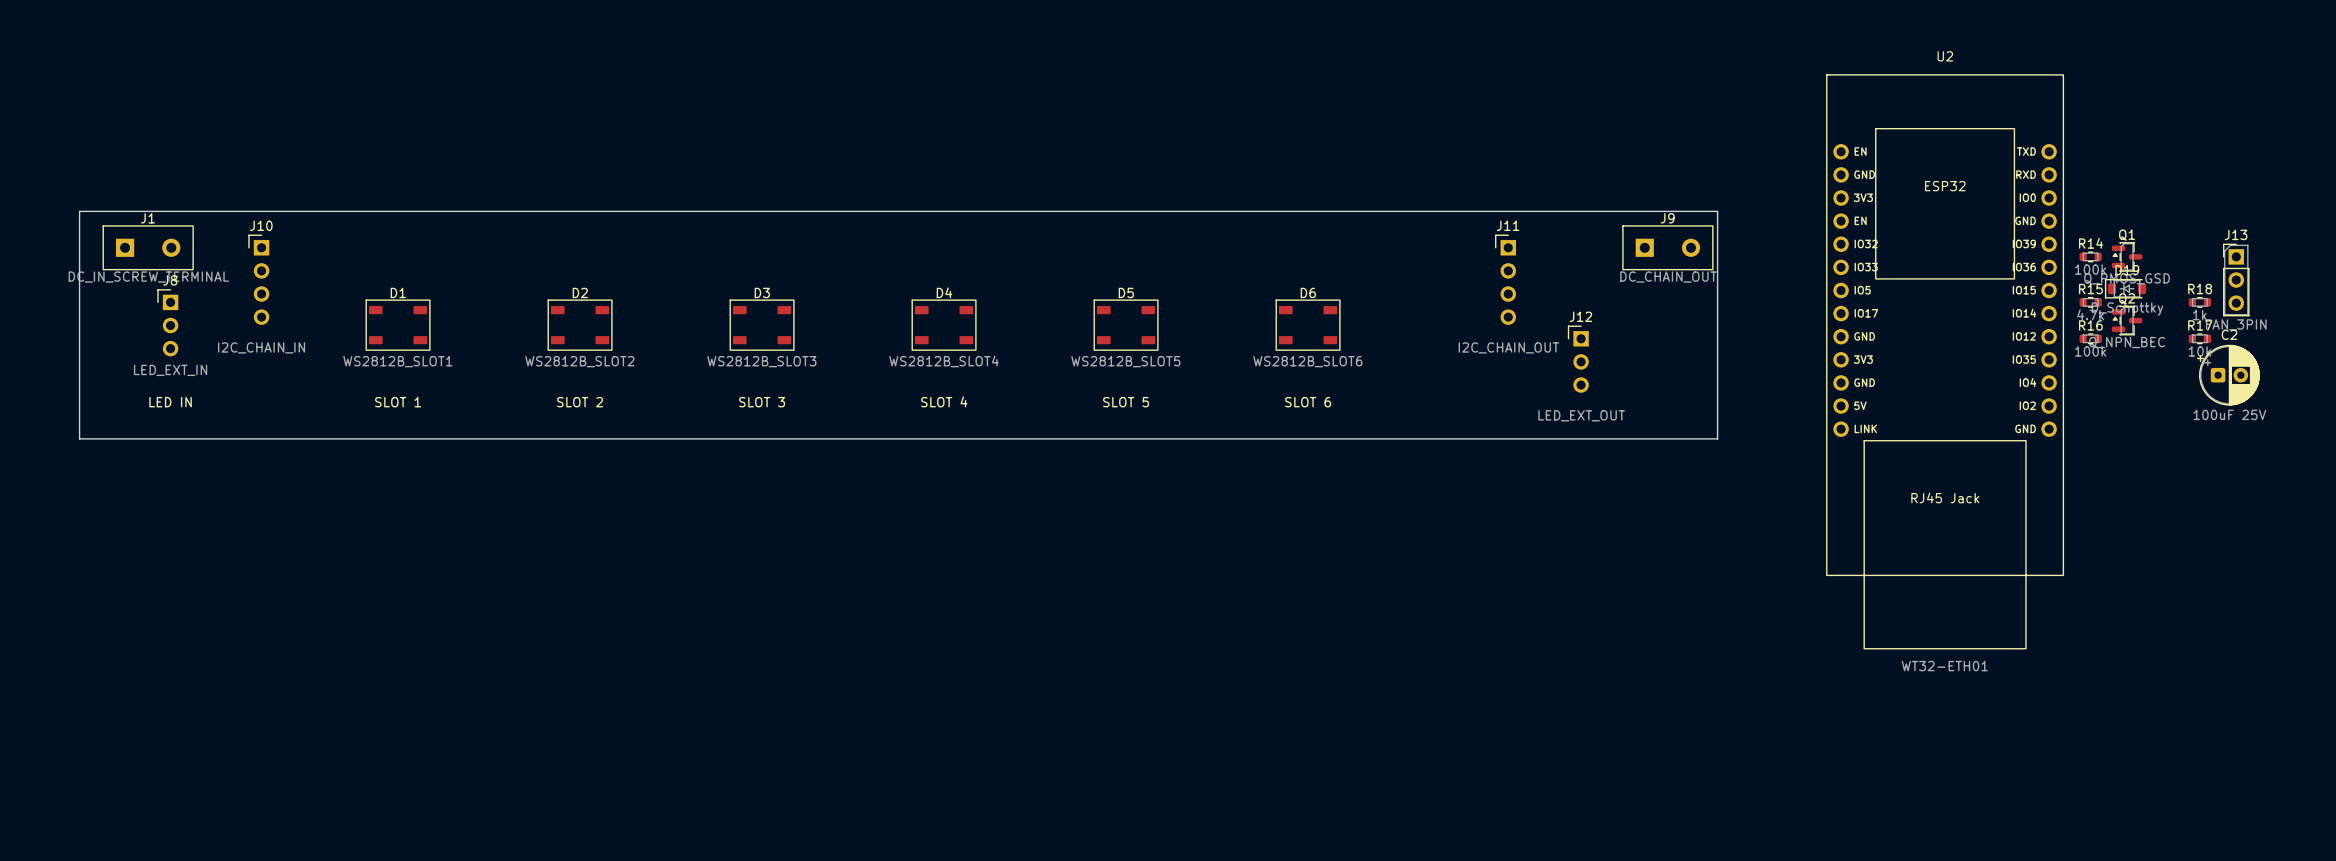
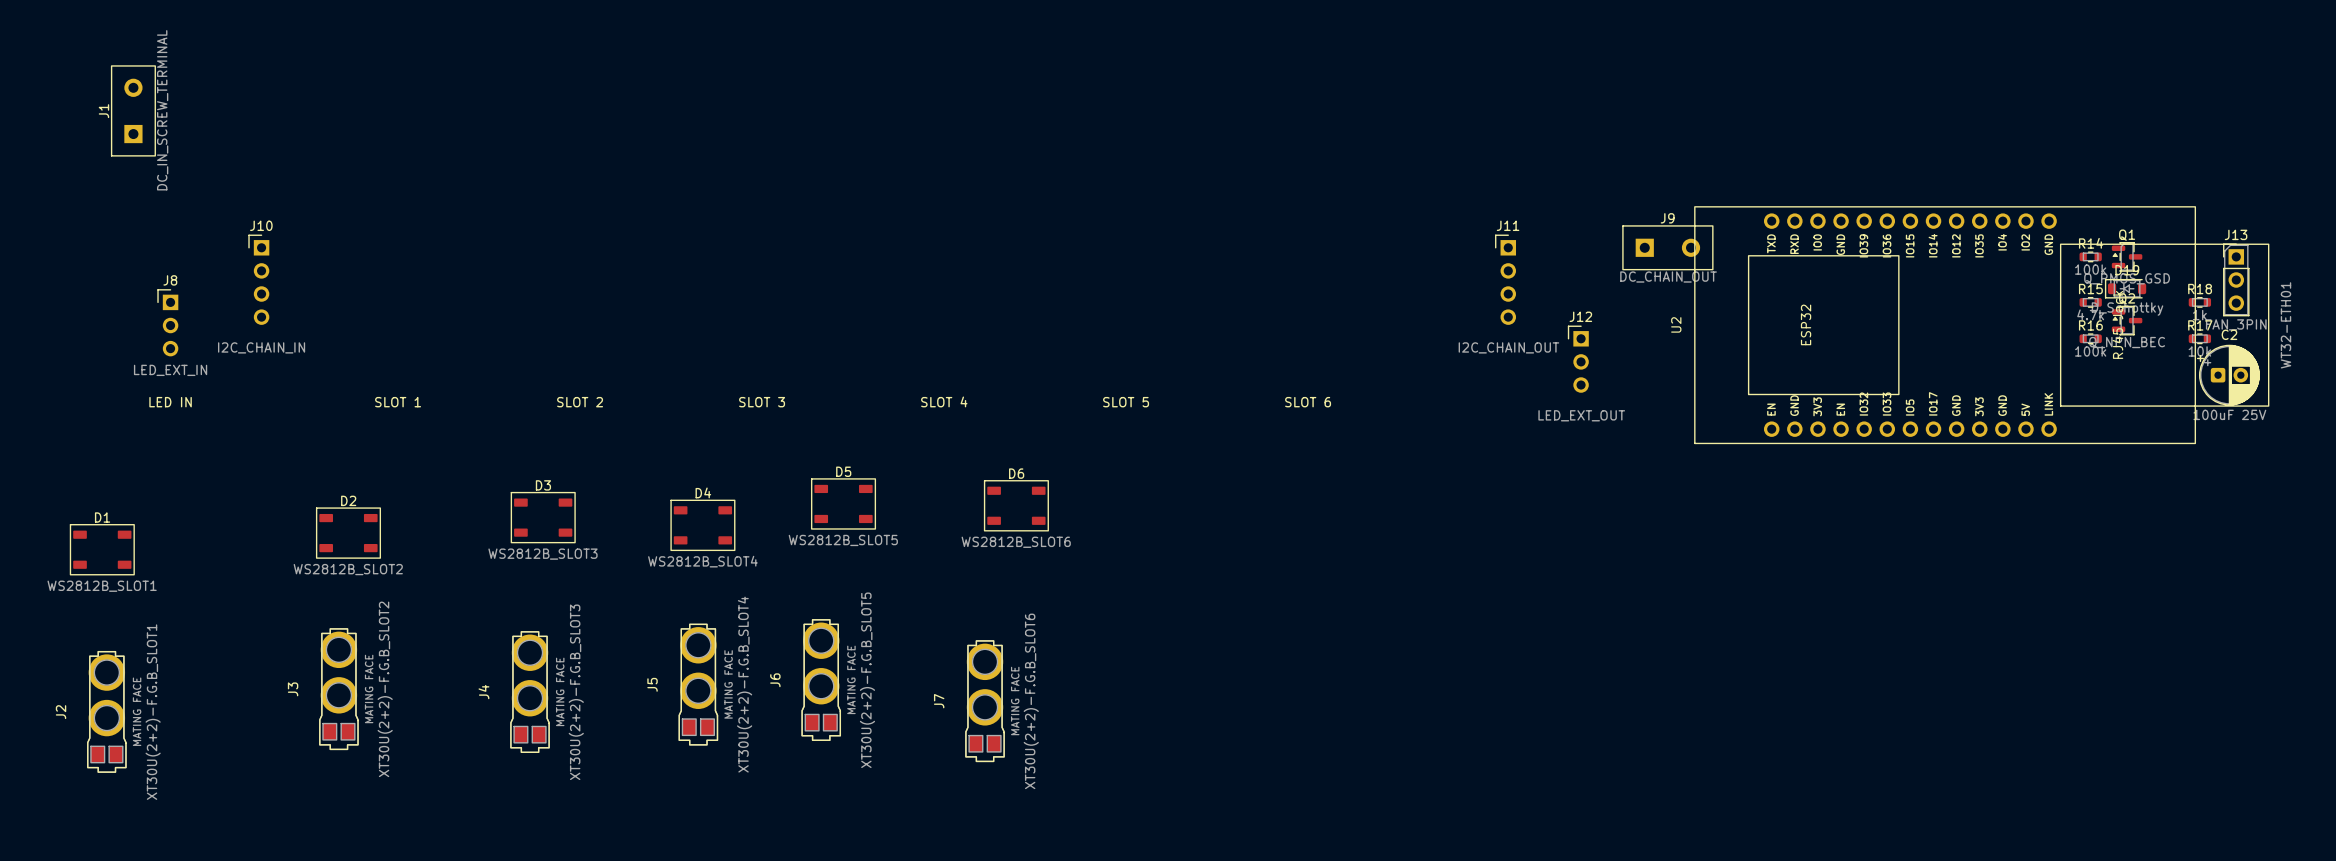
board edge: (79, 211) (1717, 211) (1717, 438) (79, 438) (79, 211) -> none
J1 rotation: 0° (148, 247) -> 90° counterclockwise (133, 110)
J1 position: (148, 247) -> (133, 110)
D1 position: (398, 325) -> (102, 549)
D2 position: (580, 325) -> (348, 533)
D3 position: (762, 325) -> (543, 517)
D4 position: (944, 325) -> (702, 525)
D5 position: (1126, 325) -> (843, 503)
D6 position: (1308, 325) -> (1016, 505)
U2 rotation: 0° (1945, 361) -> 90° counterclockwise (1981, 325)
J6: none -> XT30U(2+2)-F.G.B_SLOT5 (821, 680)
J5: none -> XT30U(2+2)-F.G.B_SLOT4 (698, 684)
J3: none -> XT30U(2+2)-F.G.B_SLOT2 (338, 689)
J4: none -> XT30U(2+2)-F.G.B_SLOT3 (530, 692)
J7: none -> XT30U(2+2)-F.G.B_SLOT6 (985, 701)
J2: none -> XT30U(2+2)-F.G.B_SLOT1 (106, 711)

